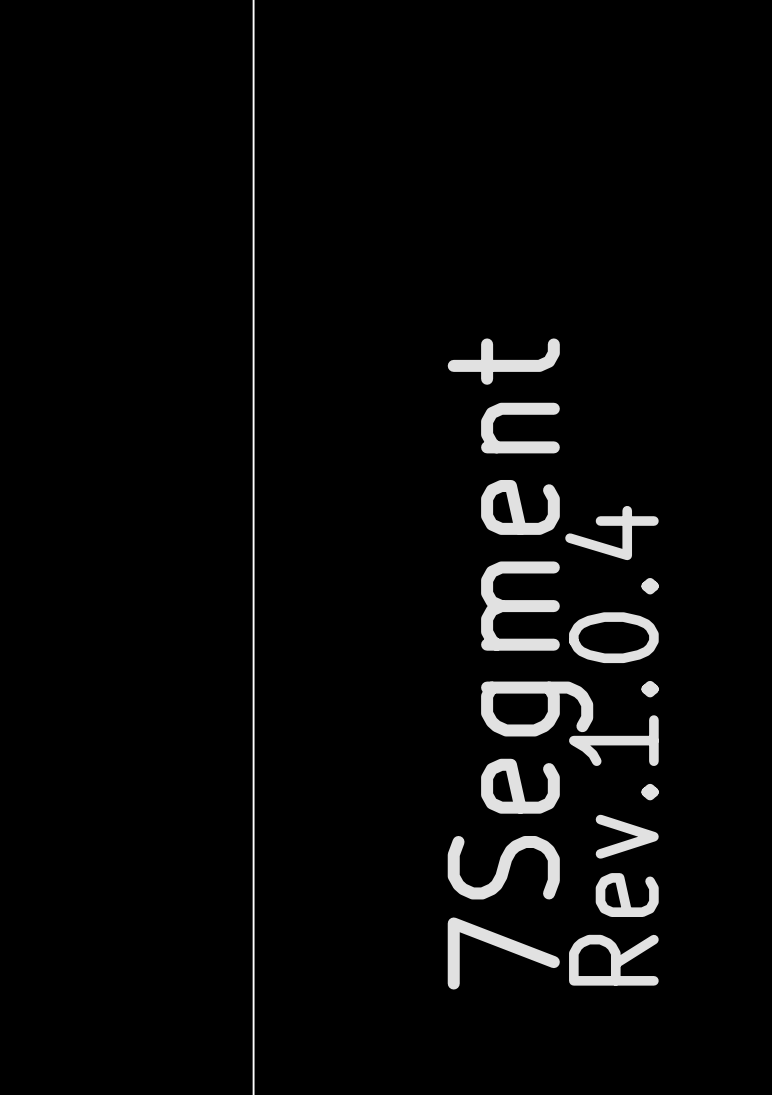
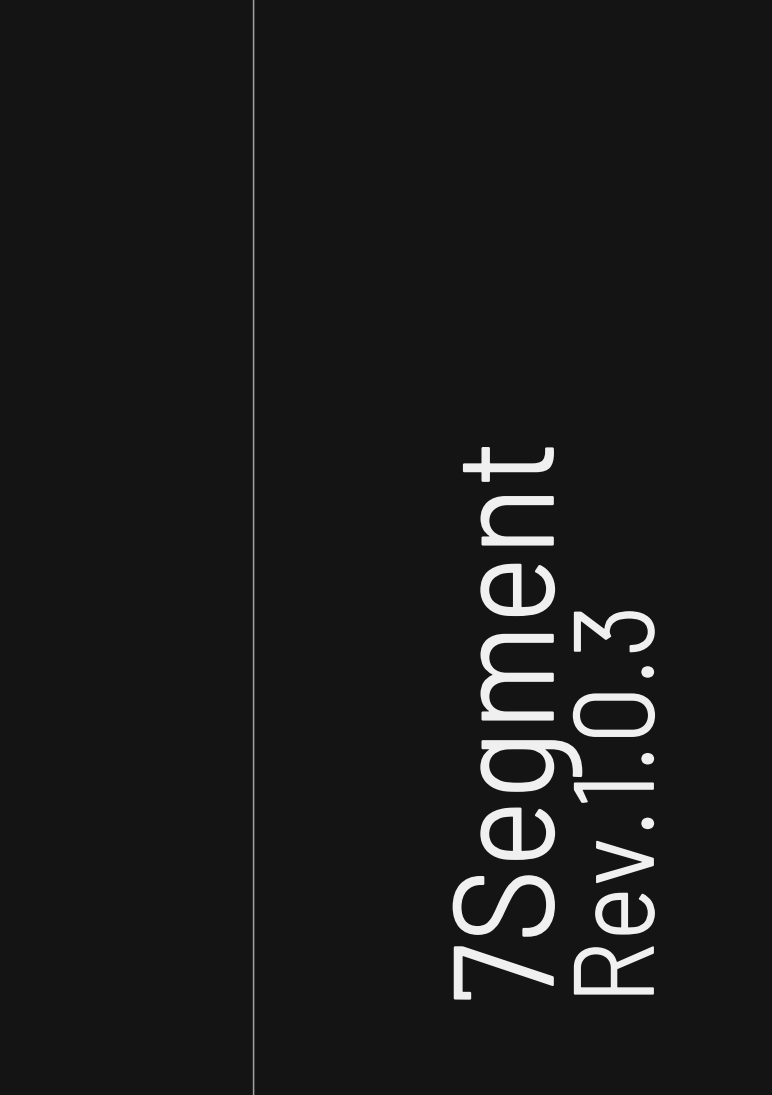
text: Rev.1.0.4 (611, 745) -> Rev.1.0.3 (613, 802)

